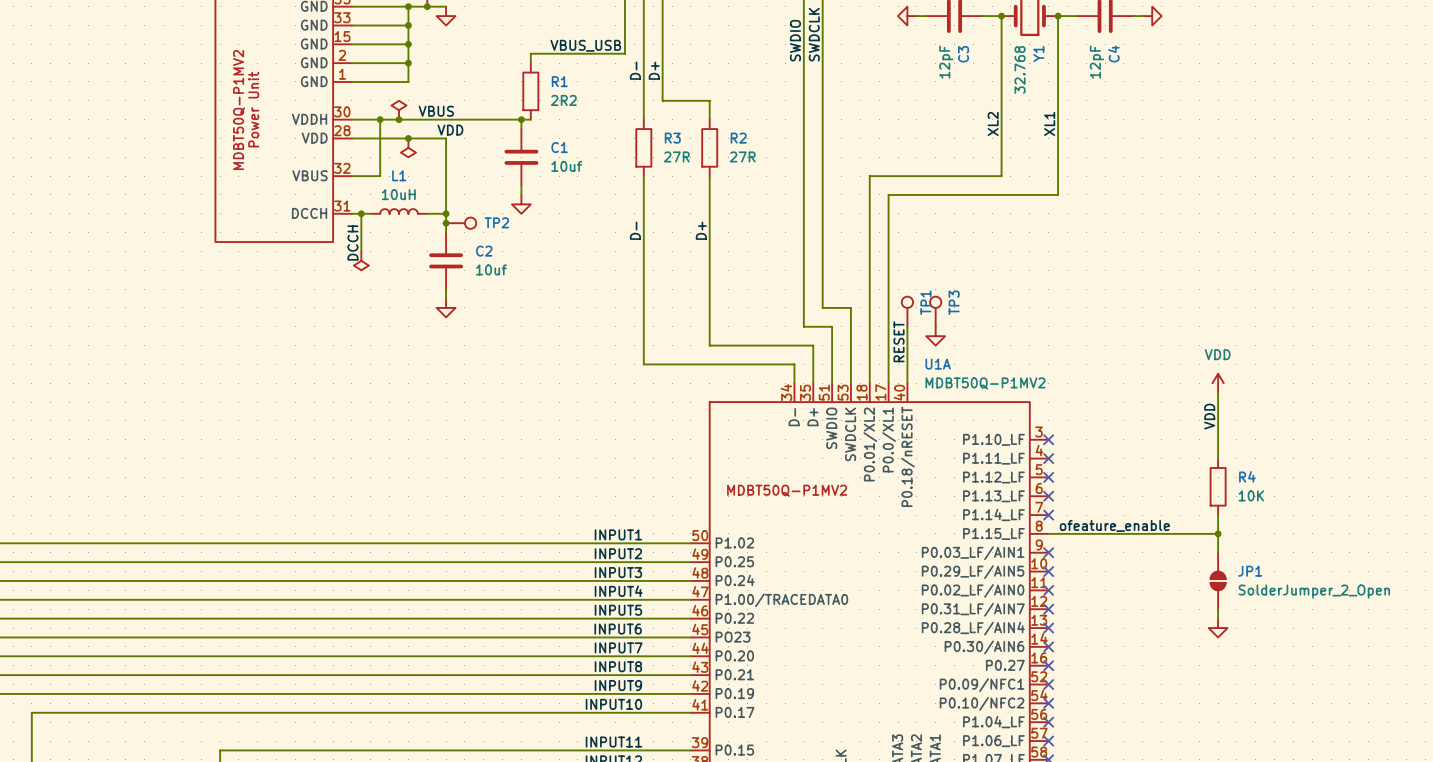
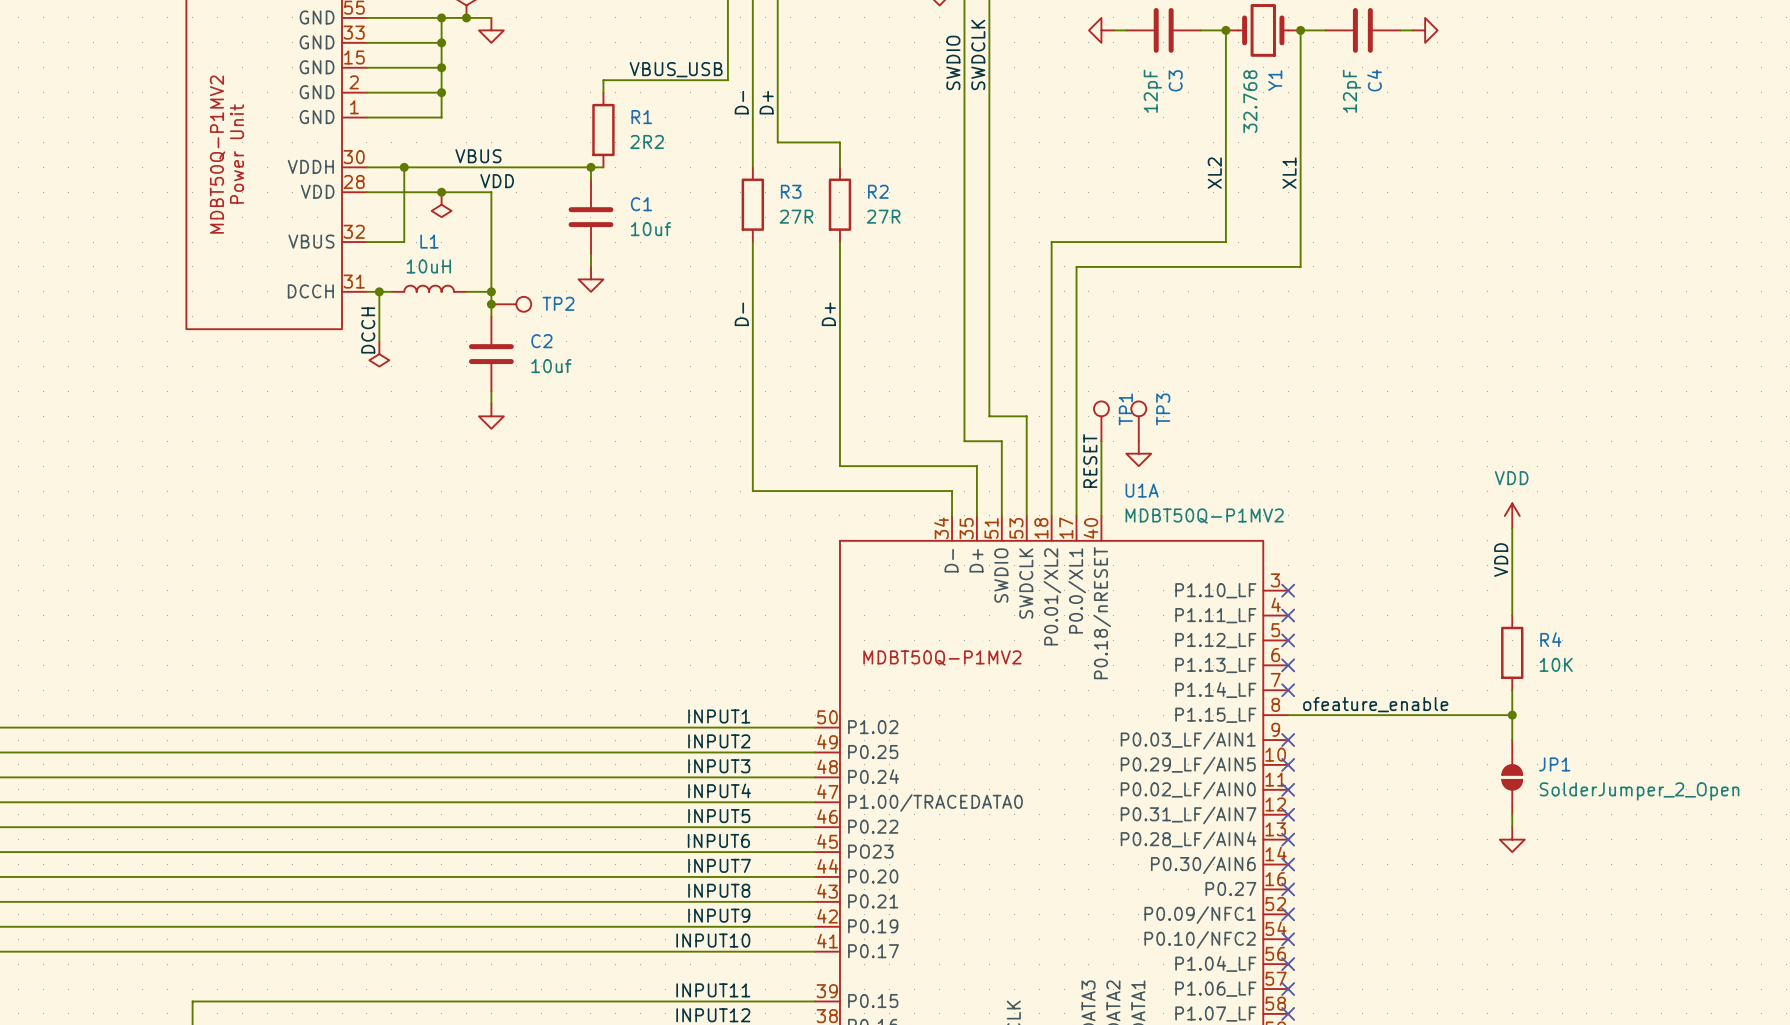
power symbol: (399, 110) -> none
junction: (399, 119) -> none

